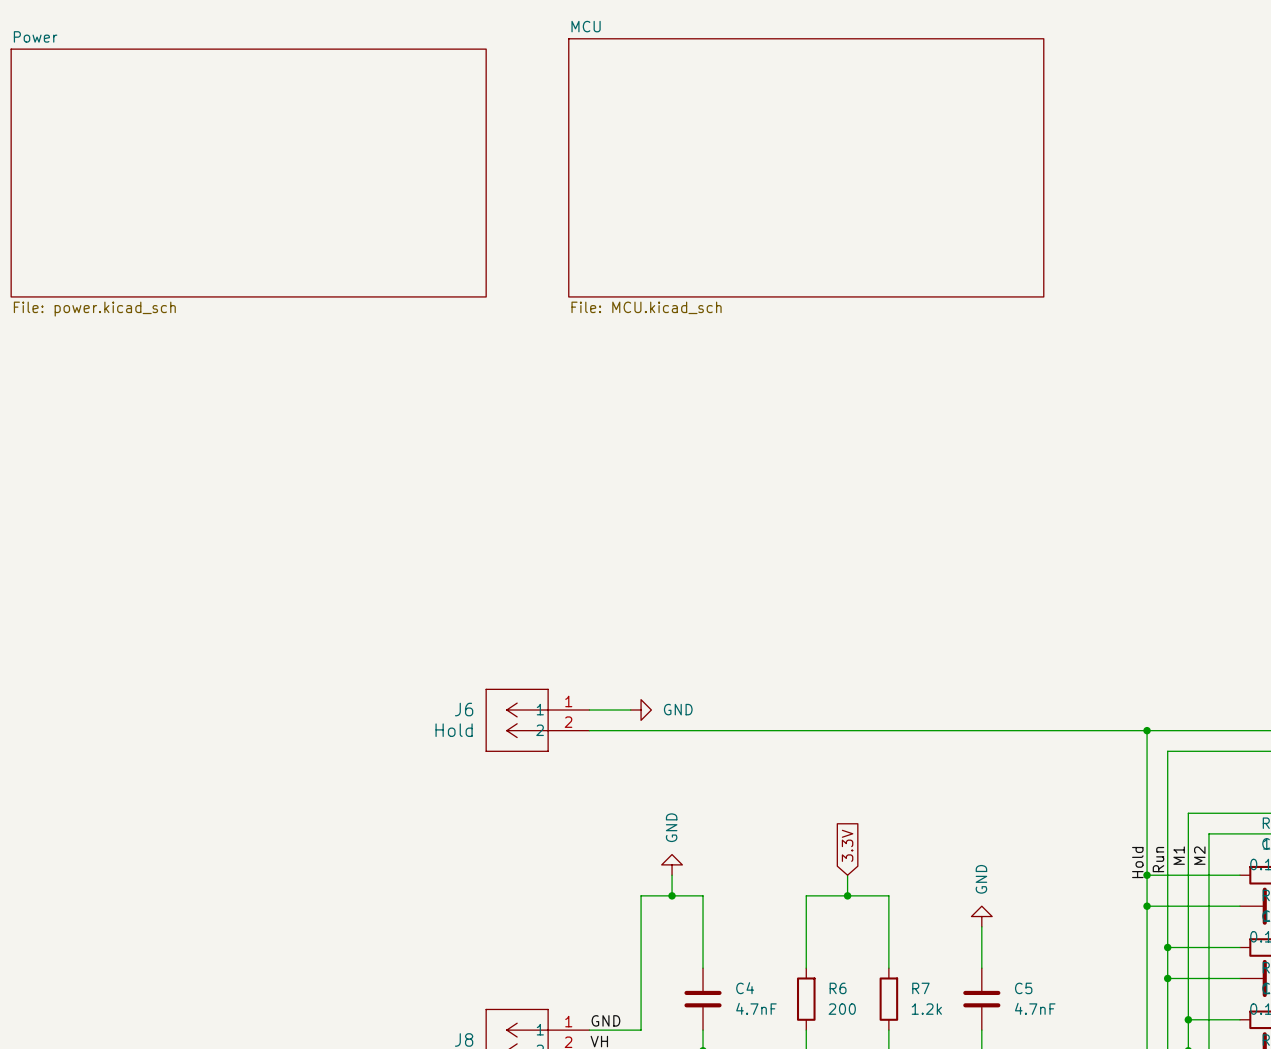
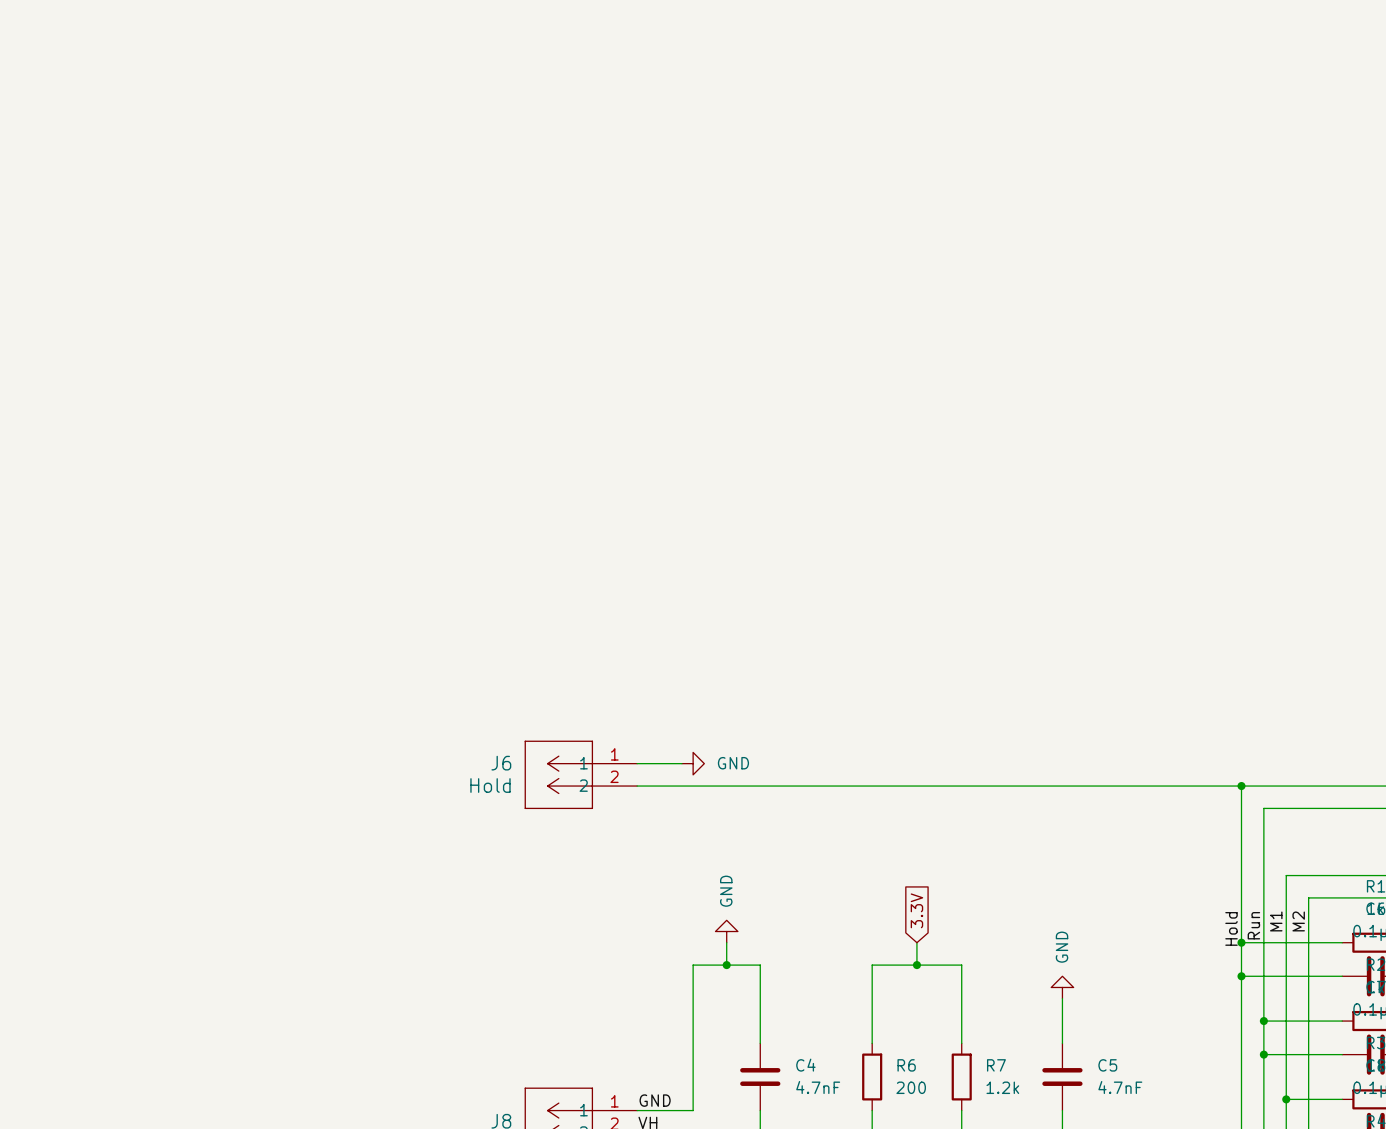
sheet MCU: File: MCU.kicad_sch (806, 167) -> none
sheet Power: File: power.kicad_sch (248, 173) -> none

